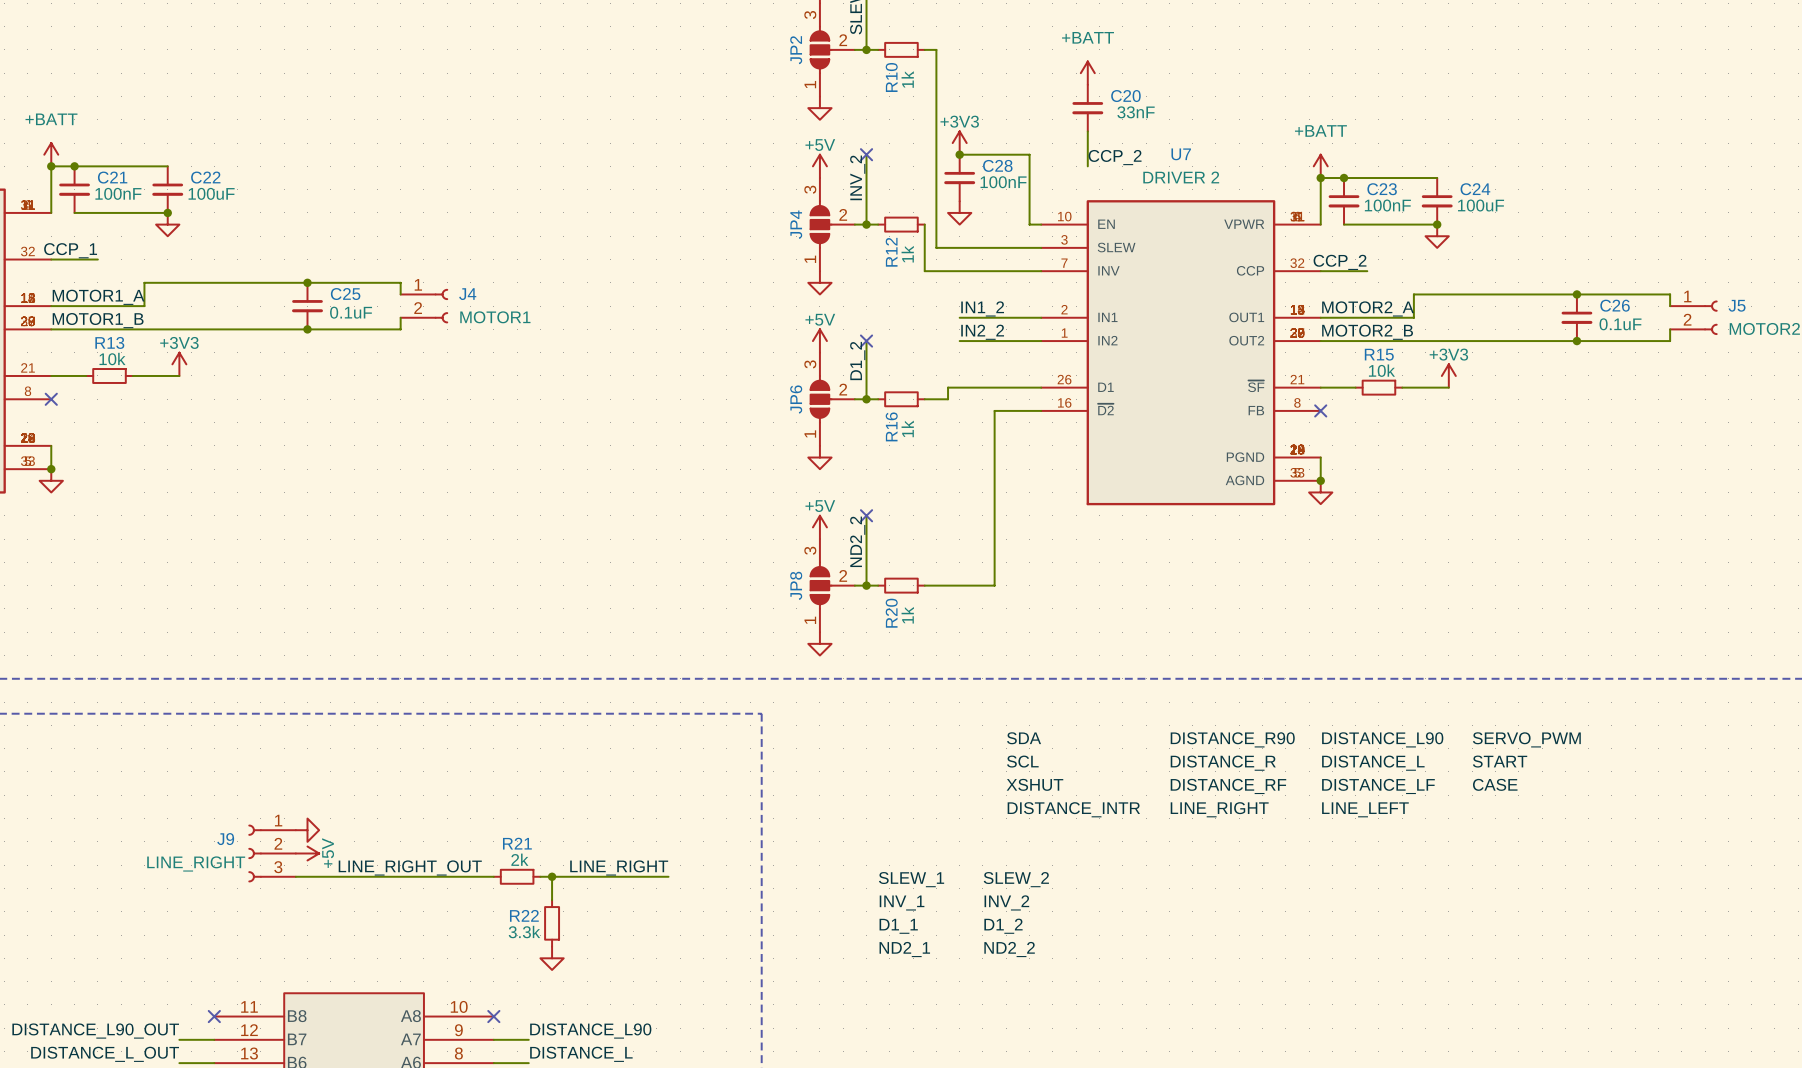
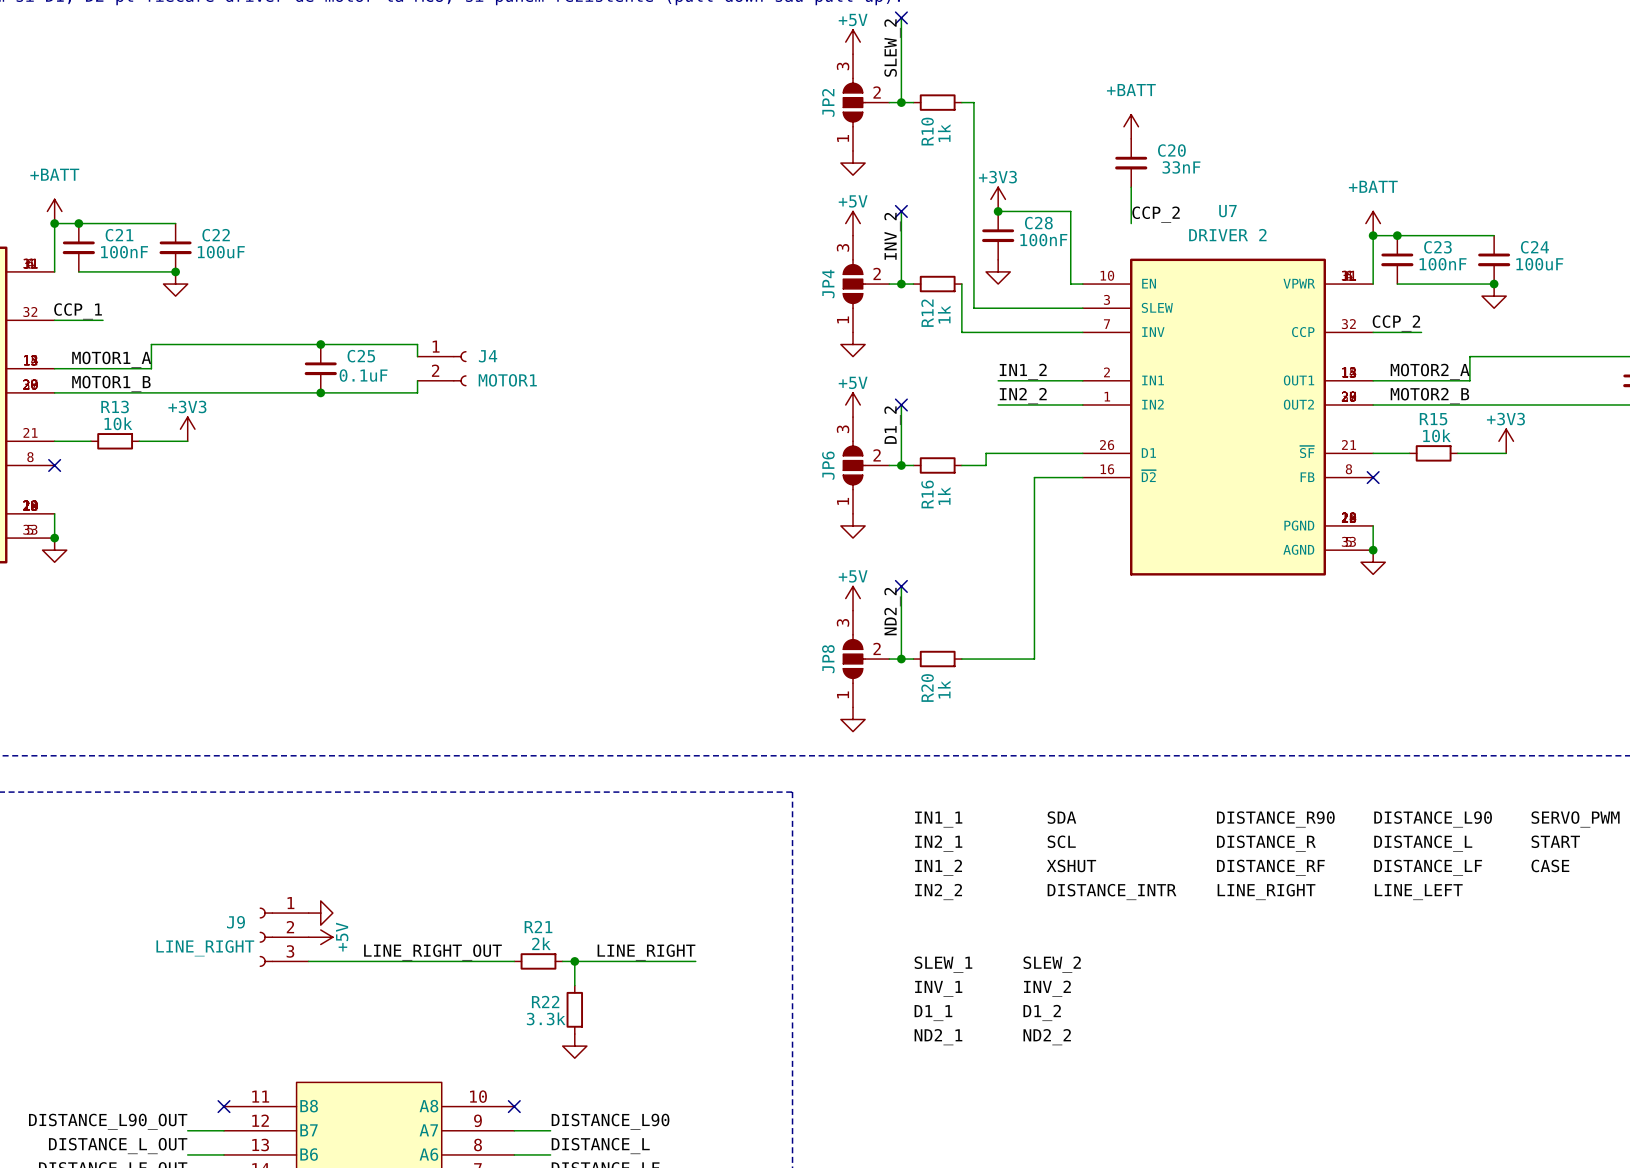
label: none -> IN1_1 (938, 819)
label: none -> IN2_1 (938, 843)
label: none -> IN1_2 (938, 867)
label: none -> IN2_2 (938, 892)

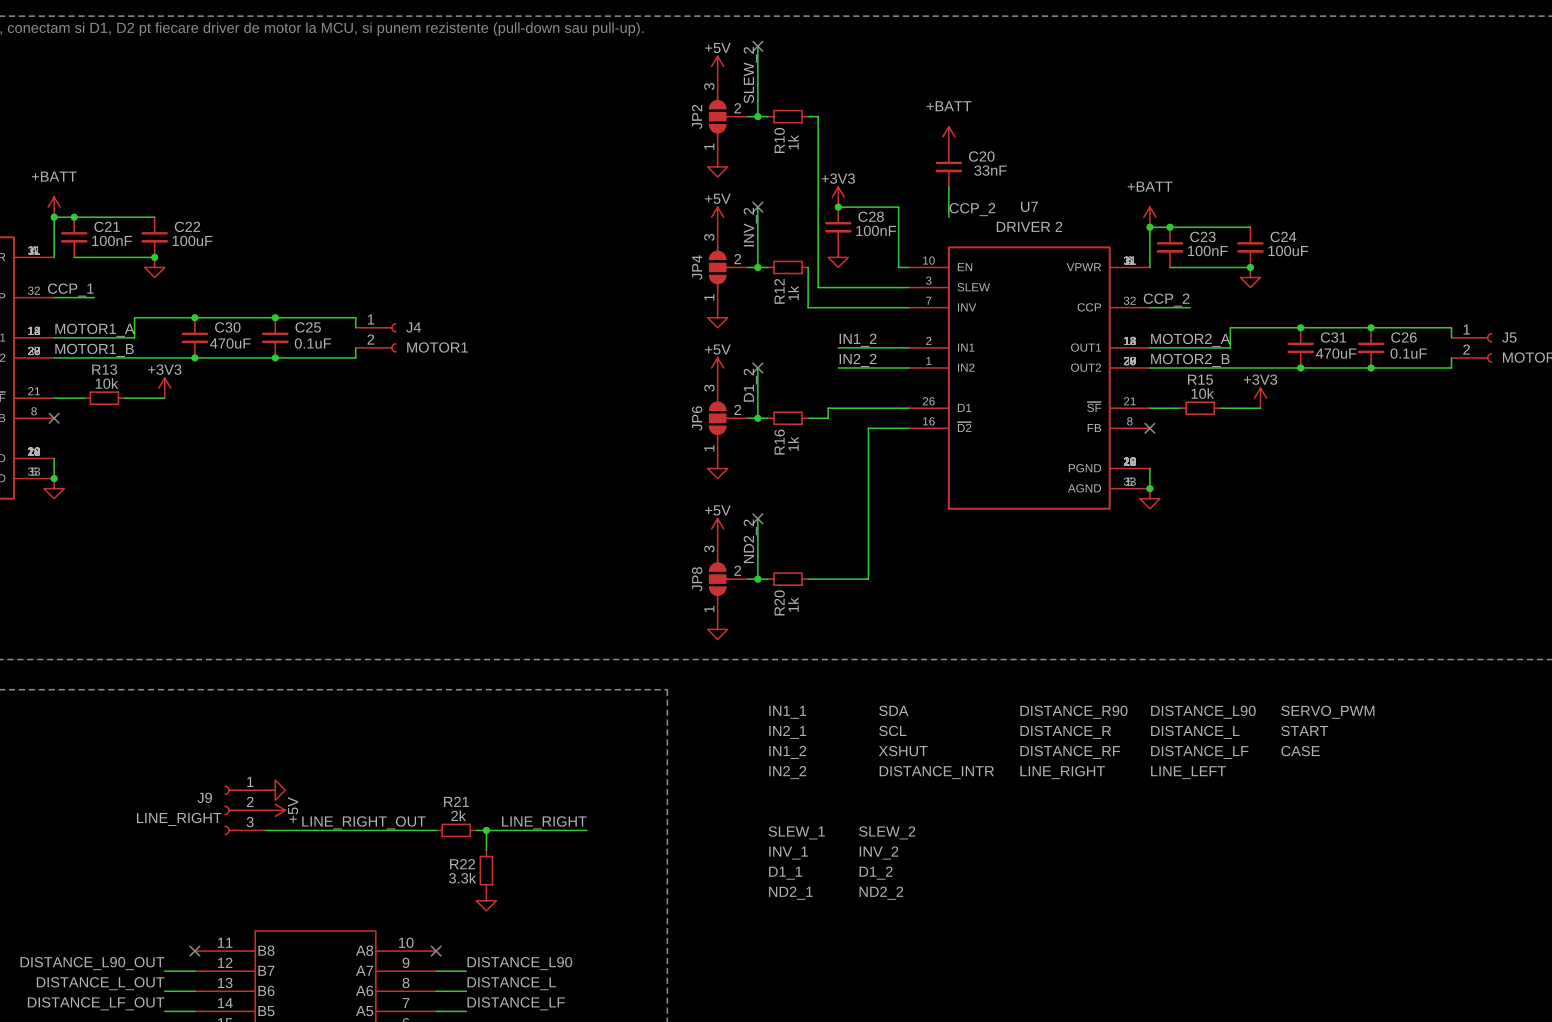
junction: none -> (194, 317)
junction: none -> (1300, 327)
C30: none -> 470uF (194, 337)
C31: none -> 470uF (1300, 347)
junction: none -> (194, 357)
junction: none -> (1300, 367)

